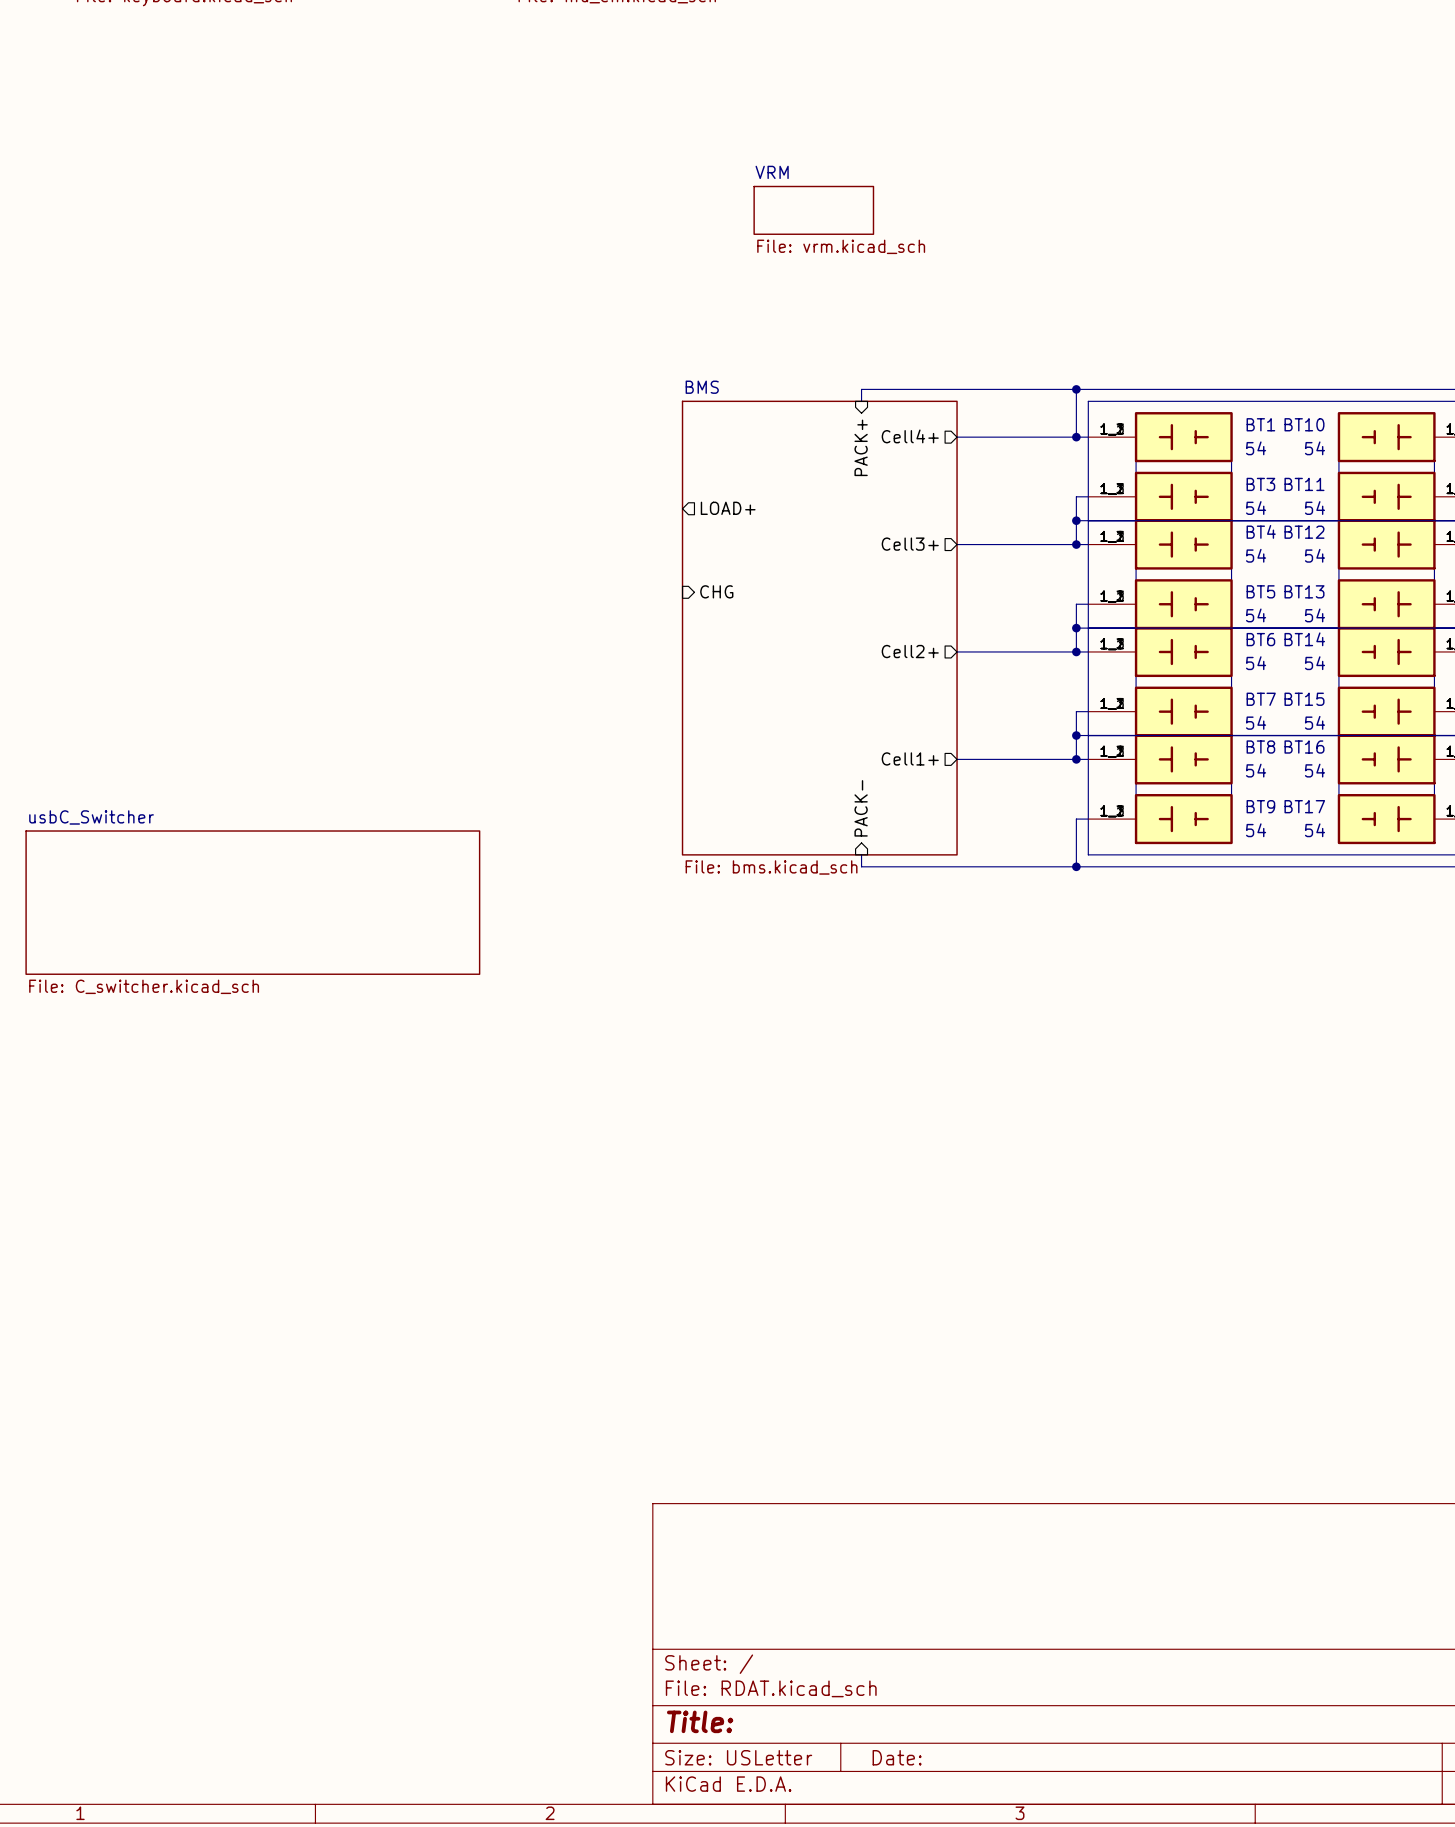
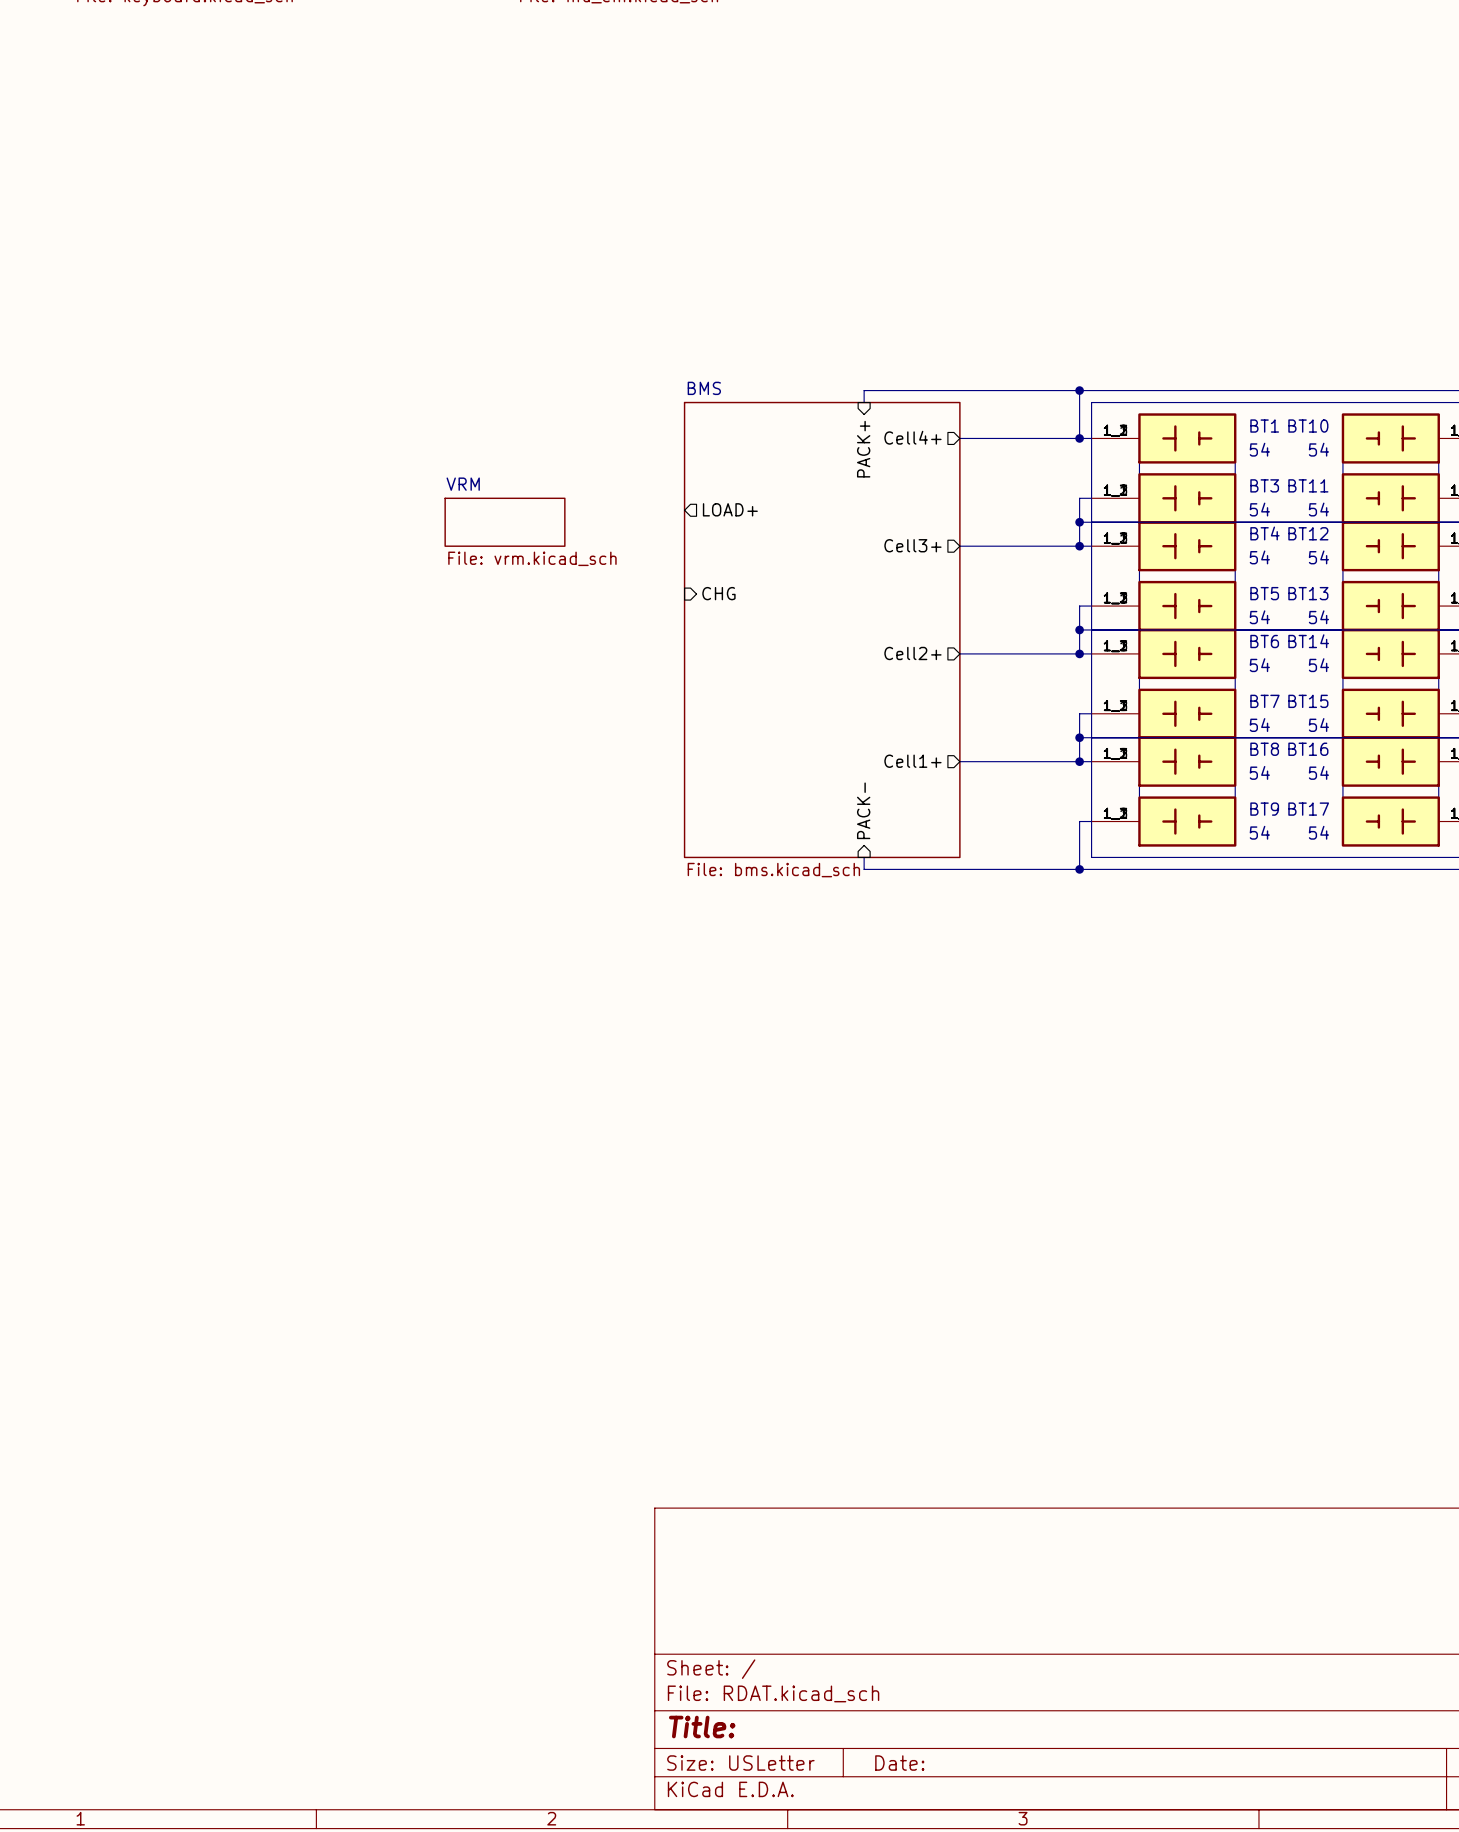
sheet VRM: File: vrm.kicad_sch (813, 210) -> none
sheet VRM: none -> File: vrm.kicad_sch (505, 522)
sheet usbC_Switcher: File: C_switcher.kicad_sch (252, 902) -> none

